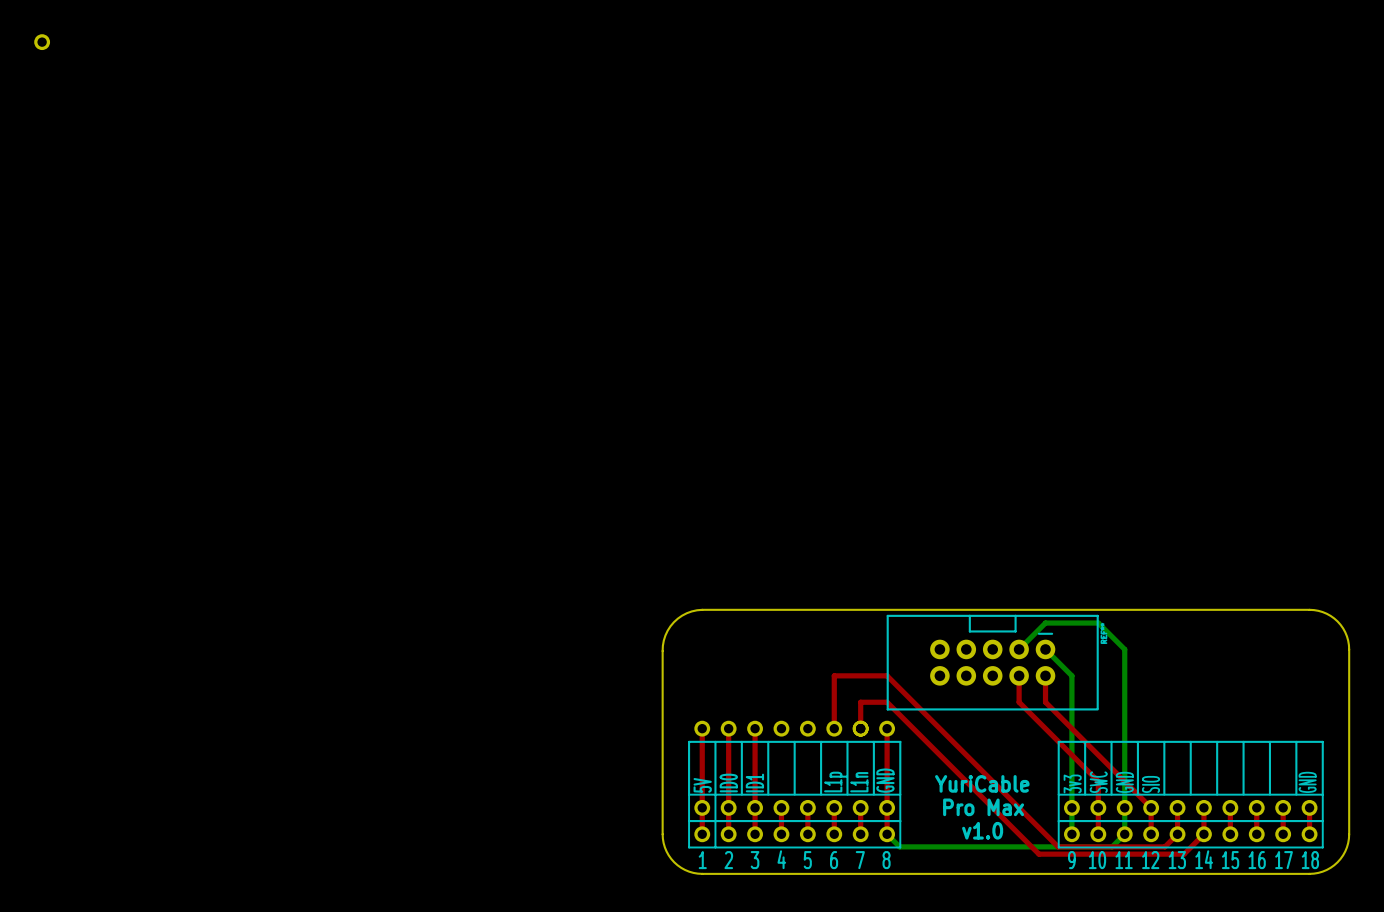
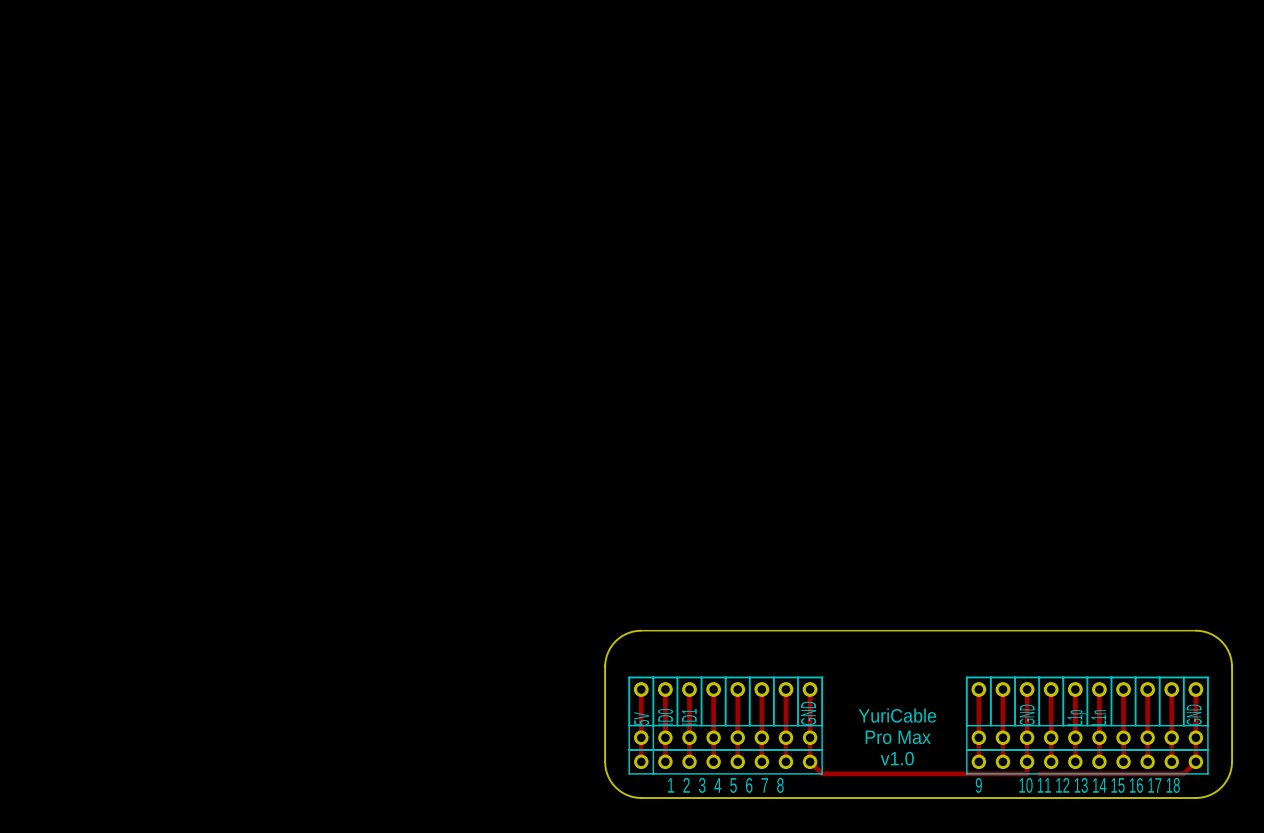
part: (42, 42) -> none
bottom track: (1019, 649) (1045, 623) (1098, 623) (1124, 649) (1124, 834) (1112, 846) (899, 846) (887, 834) -> none
bottom track: (1045, 649) (1071, 675) (1071, 834) -> none
part: (992, 662) -> none
top track: (1019, 675) (1019, 702) (1098, 781) -> (1002, 689) (1002, 713)
top track: (1045, 675) (1045, 702) (1151, 807) -> (1051, 689) (1051, 737)
board edge: (662, 728) (662, 651) (665, 635) (670, 626) (682, 615) (702, 609) (1318, 610) (1337, 621) (1348, 640) (1349, 728) -> none
top track: (702, 728) (702, 755) -> none
part: (702, 728) -> none
top track: (728, 728) (728, 755) -> none
part: (728, 728) -> none
top track: (755, 728) (755, 755) -> none
part: (755, 728) -> none
part: (781, 728) -> none
part: (807, 728) -> none
top track: (834, 728) (834, 675) (887, 675) (1058, 846) (1164, 846) (1177, 834) -> none
part: (834, 728) -> none
top track: (860, 728) (860, 702) (887, 702) (1038, 854) (1184, 854) (1203, 834) -> none
part: (860, 728) -> none
top track: (887, 728) (887, 755) -> none
part: (887, 728) -> none
board edge: none -> (605, 666) (607, 654) (615, 641) (629, 632) (641, 630) (1199, 630) (1215, 636) (1224, 644) (1230, 654) (1232, 666)
part: none -> (641, 689)
part: none -> (665, 689)
part: none -> (689, 689)
top track: none -> (713, 689) (713, 737)
part: none -> (713, 689)
top track: none -> (737, 689) (737, 737)
part: none -> (737, 689)
top track: none -> (761, 689) (761, 737)
part: none -> (761, 689)
top track: none -> (785, 689) (785, 737)
part: none -> (785, 689)
part: none -> (810, 689)
top track: none -> (978, 689) (978, 761)
part: none -> (978, 689)
part: none -> (1002, 689)
top track: none -> (1027, 689) (1027, 773)
part: none -> (1027, 689)
part: none -> (1051, 689)
top track: none -> (1075, 689) (1075, 737)
part: none -> (1075, 689)
top track: none -> (1099, 689) (1099, 737)
part: none -> (1099, 689)
top track: none -> (1123, 689) (1123, 737)
part: none -> (1123, 689)
top track: none -> (1147, 689) (1147, 737)
part: none -> (1147, 689)
top track: none -> (1171, 689) (1171, 737)
part: none -> (1171, 689)
top track: none -> (1195, 689) (1195, 737)
part: none -> (1195, 689)
text: L1p (835, 782) -> none
text: L1n (859, 782) -> none
text: SWC (1098, 782) -> none
text: 3v3 (1072, 783) -> none
text: none -> L1p (1077, 717)
text: none -> L1n (1098, 717)
text: SIO (1150, 784) -> none
top track: none -> (810, 761) (822, 773) (1027, 773)
top track: none -> (1195, 761) (1183, 773) (1039, 773)

